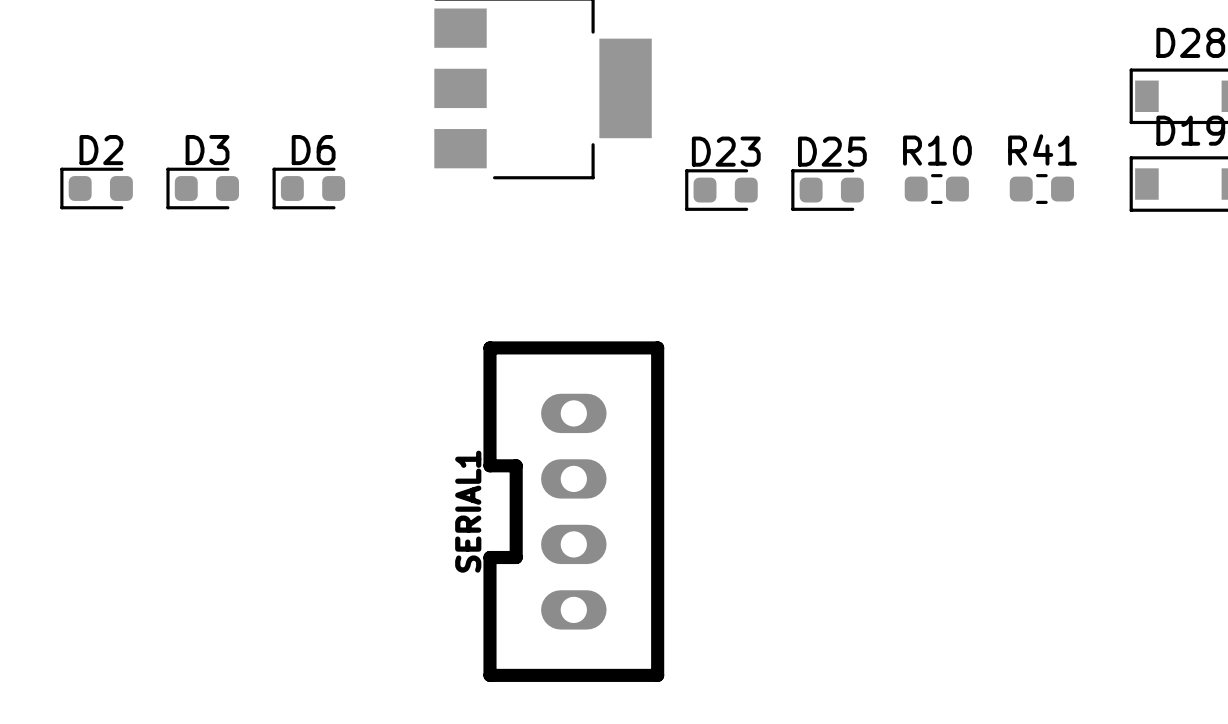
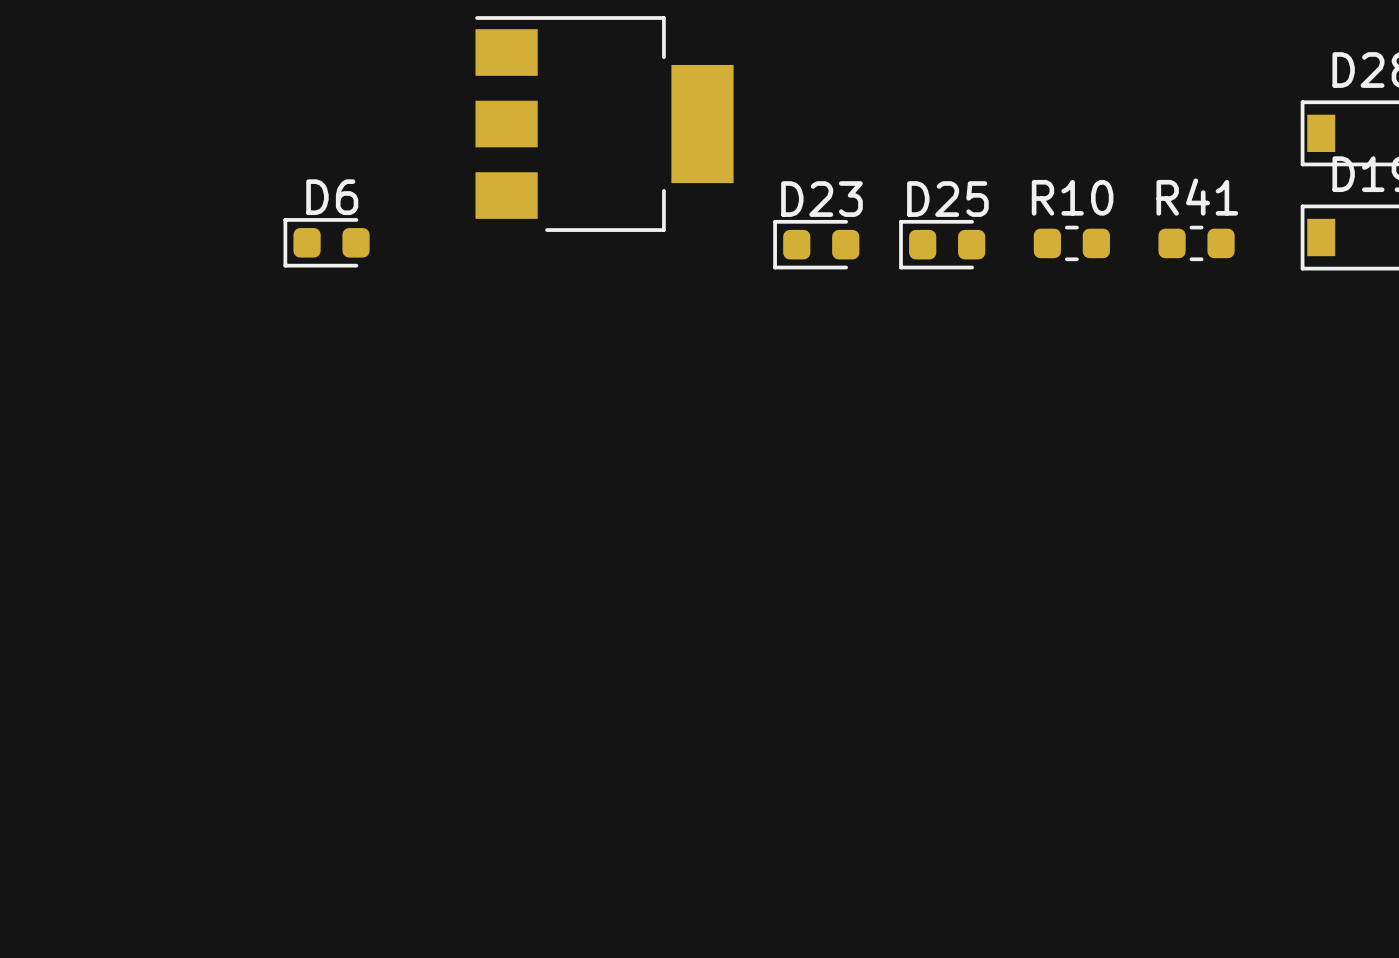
D2: (96, 188) -> none
D3: (202, 188) -> none
part: SERIAL1 (573, 511) -> none

